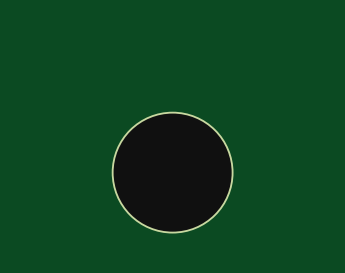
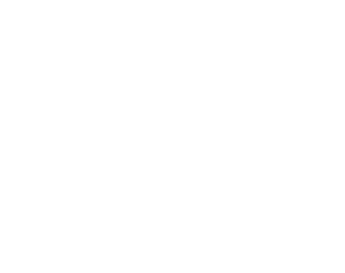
part: (172, 172) -> none

